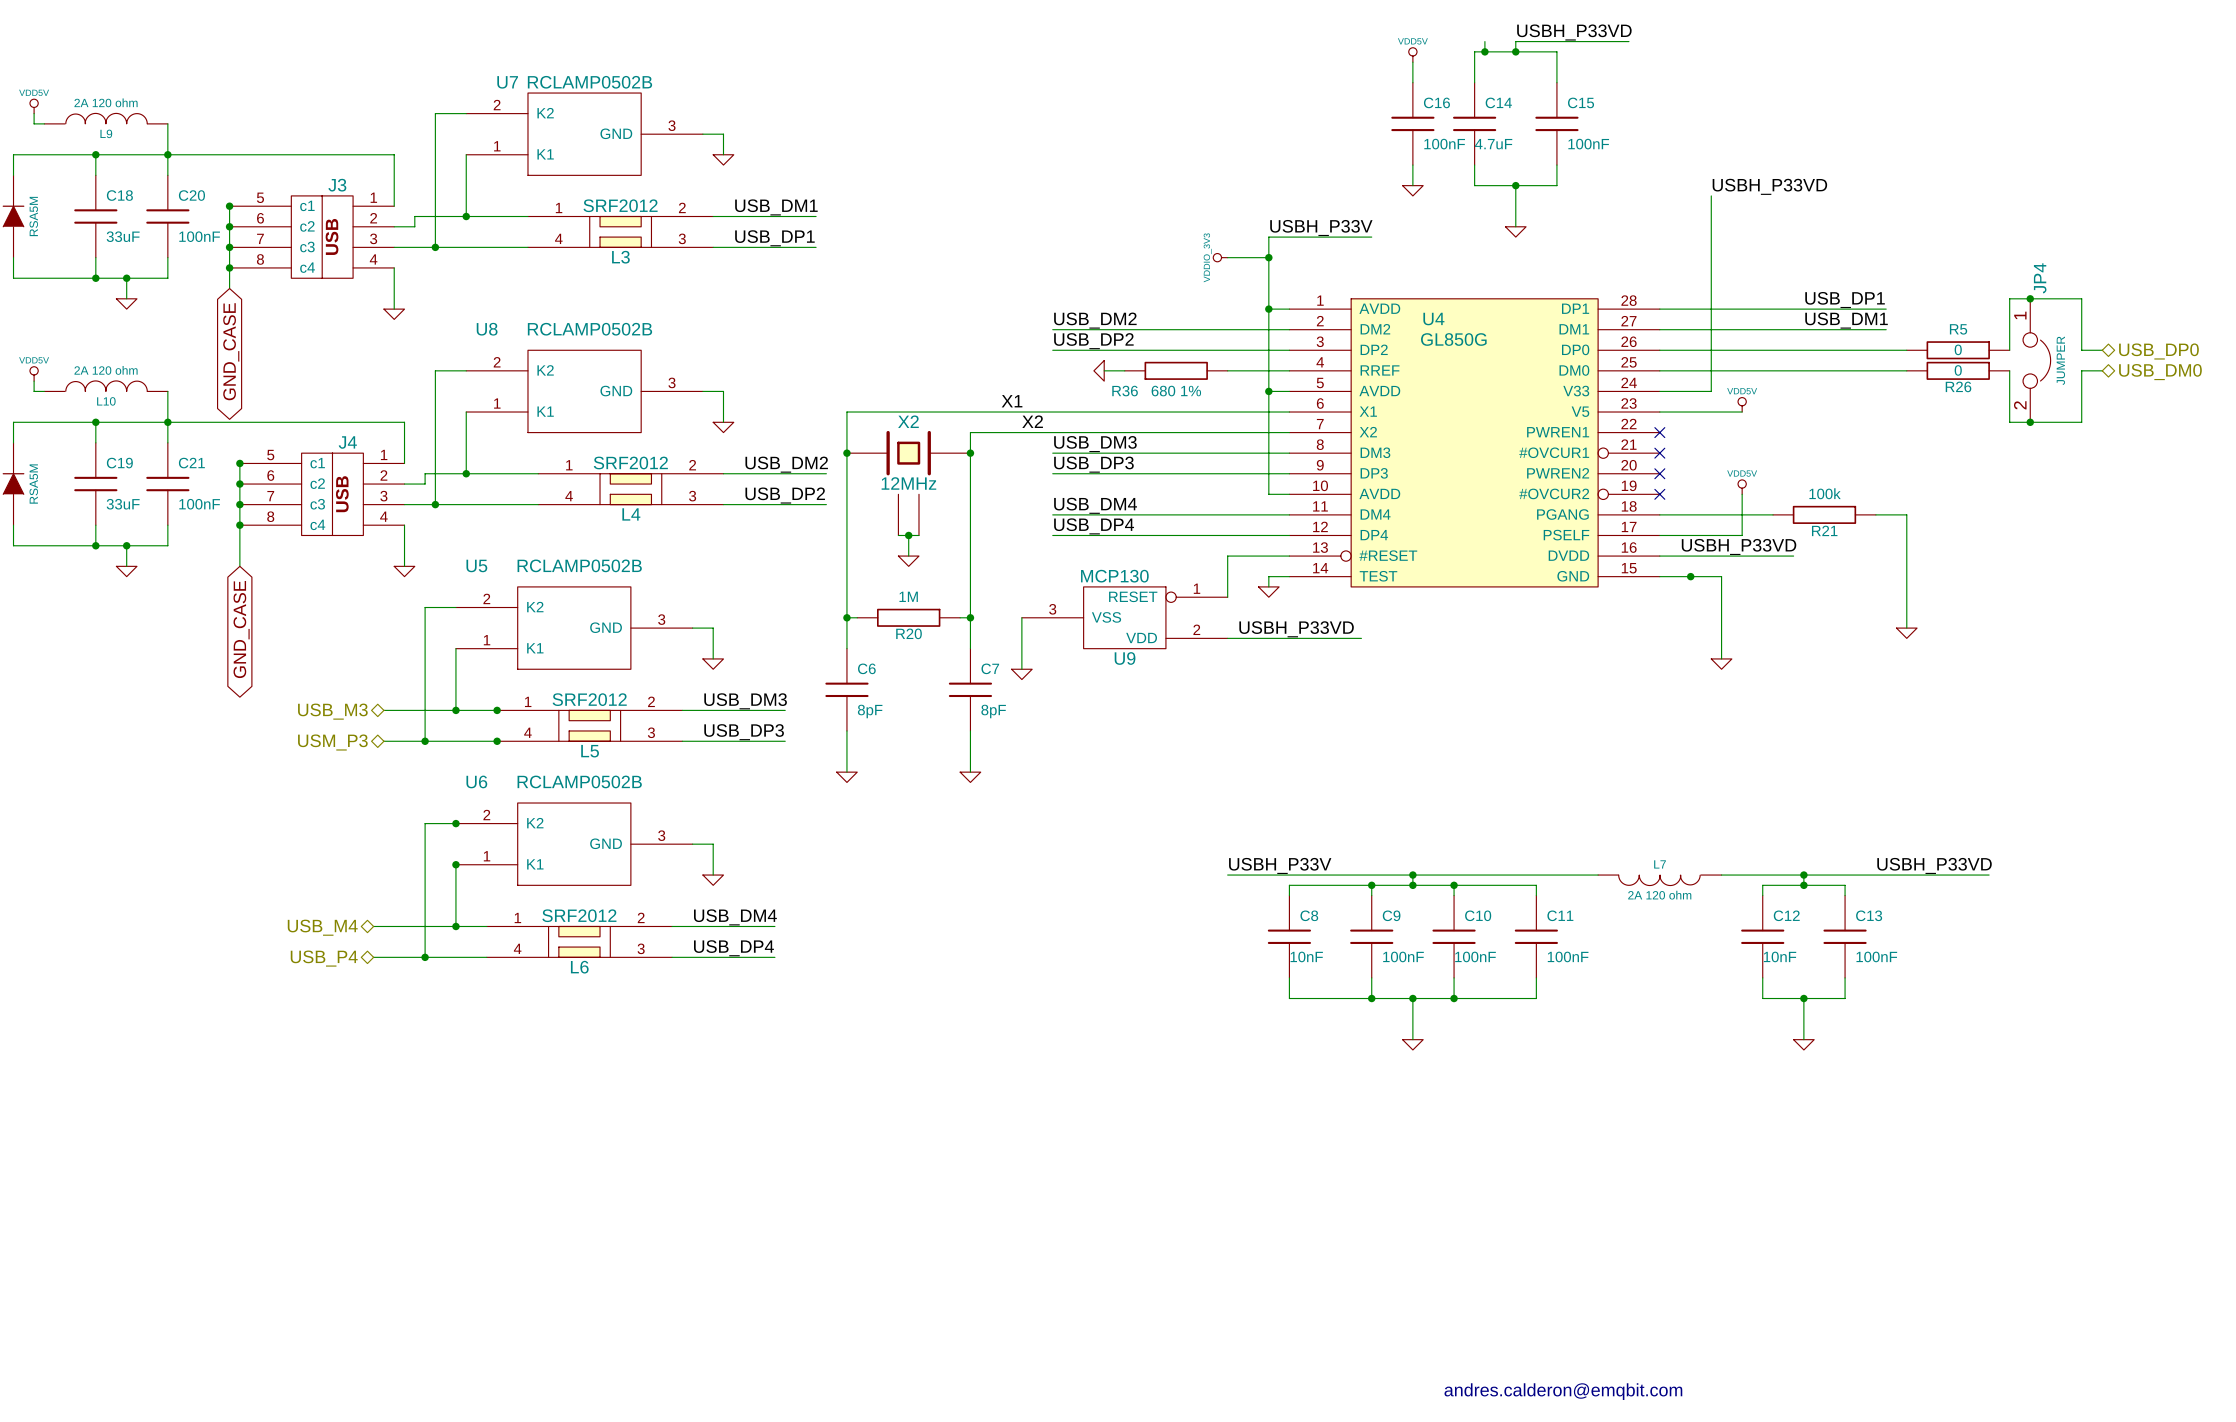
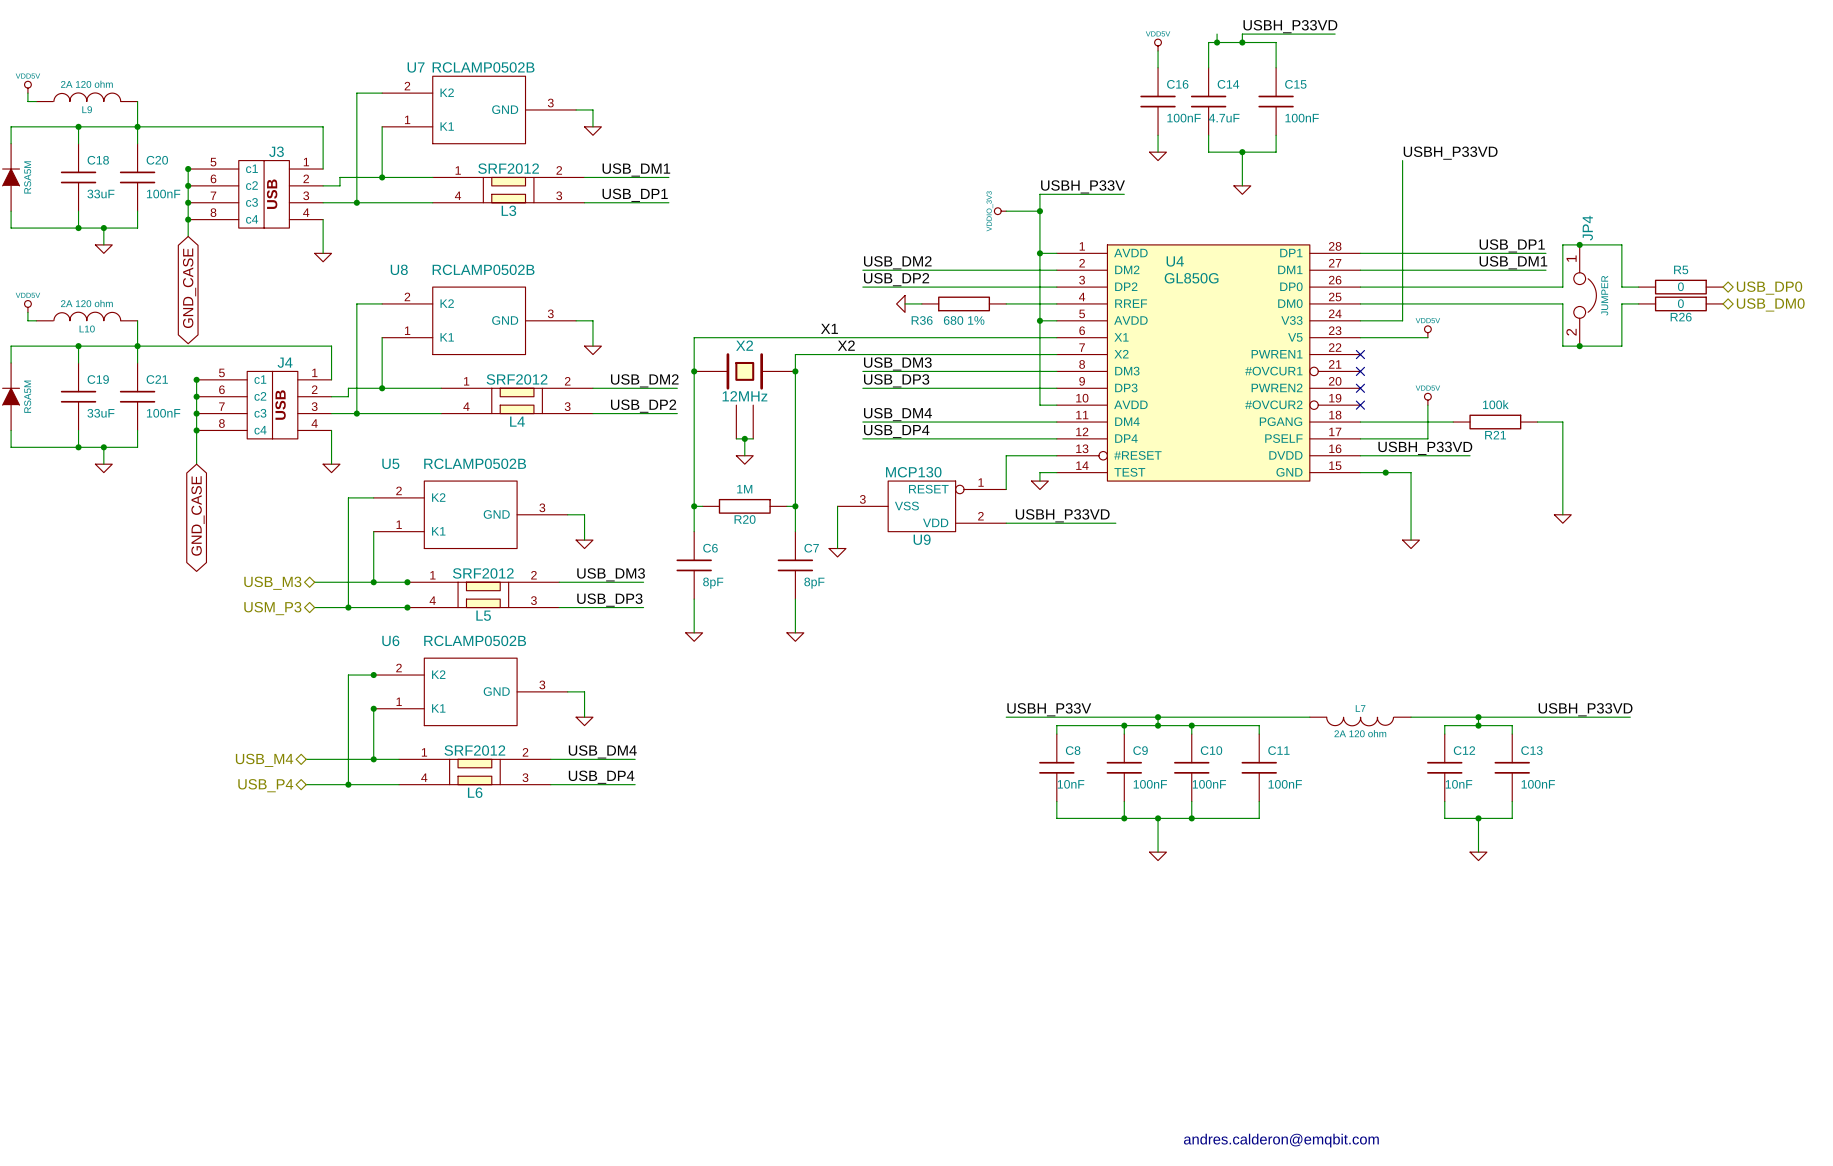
junction: none -> (1579, 244)
junction: (2030, 298) -> none
R5 position: (1958, 350) -> (1680, 287)
wire: (2009, 350) (2009, 298) (2081, 298) (2081, 350) (2102, 350) -> (1562, 287) (1562, 244) (1621, 244) (1621, 287) (1638, 287)
JP4 position: (2036, 360) -> (1585, 295)
R26 position: (1958, 370) -> (1680, 303)
wire: (2009, 370) (2009, 422) (2081, 422) (2081, 370) (2102, 370) -> (1562, 303) (1562, 346) (1621, 346) (1621, 303) (1638, 303)
junction: none -> (1579, 346)
junction: (2030, 422) -> none

